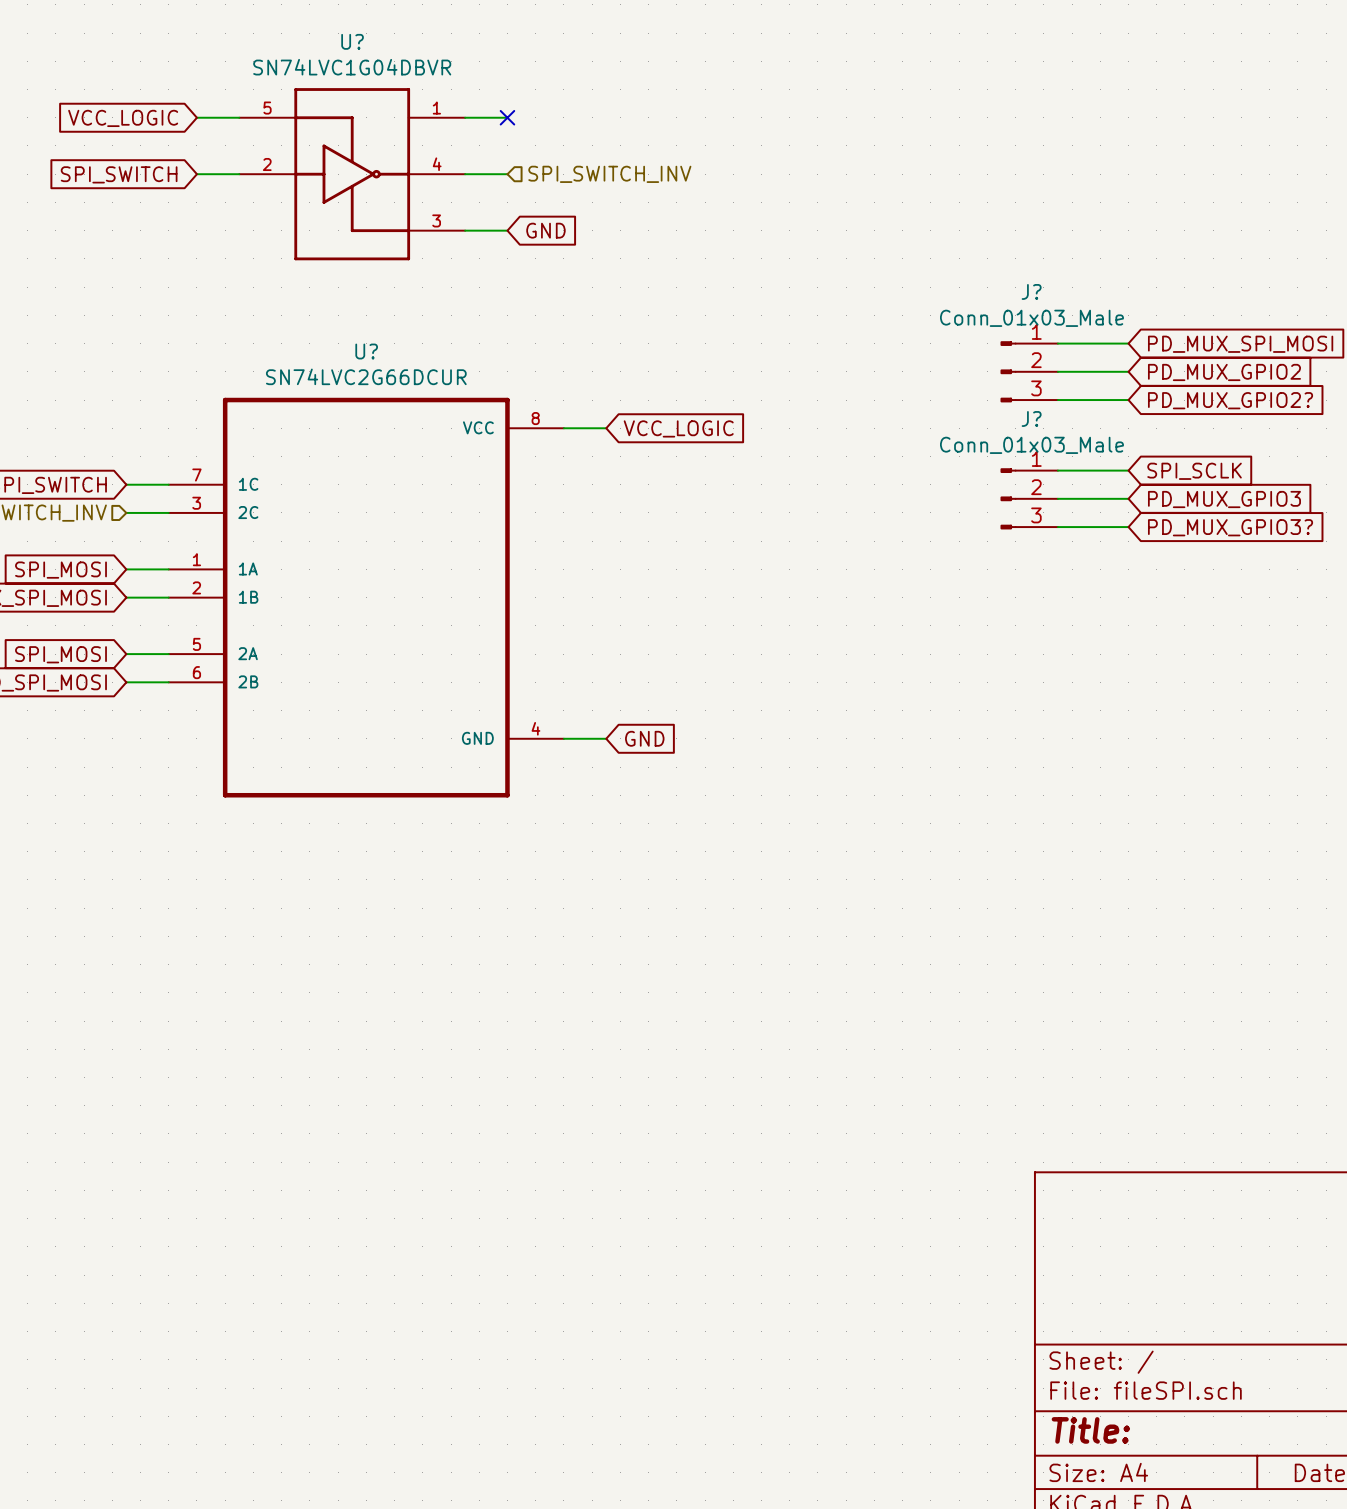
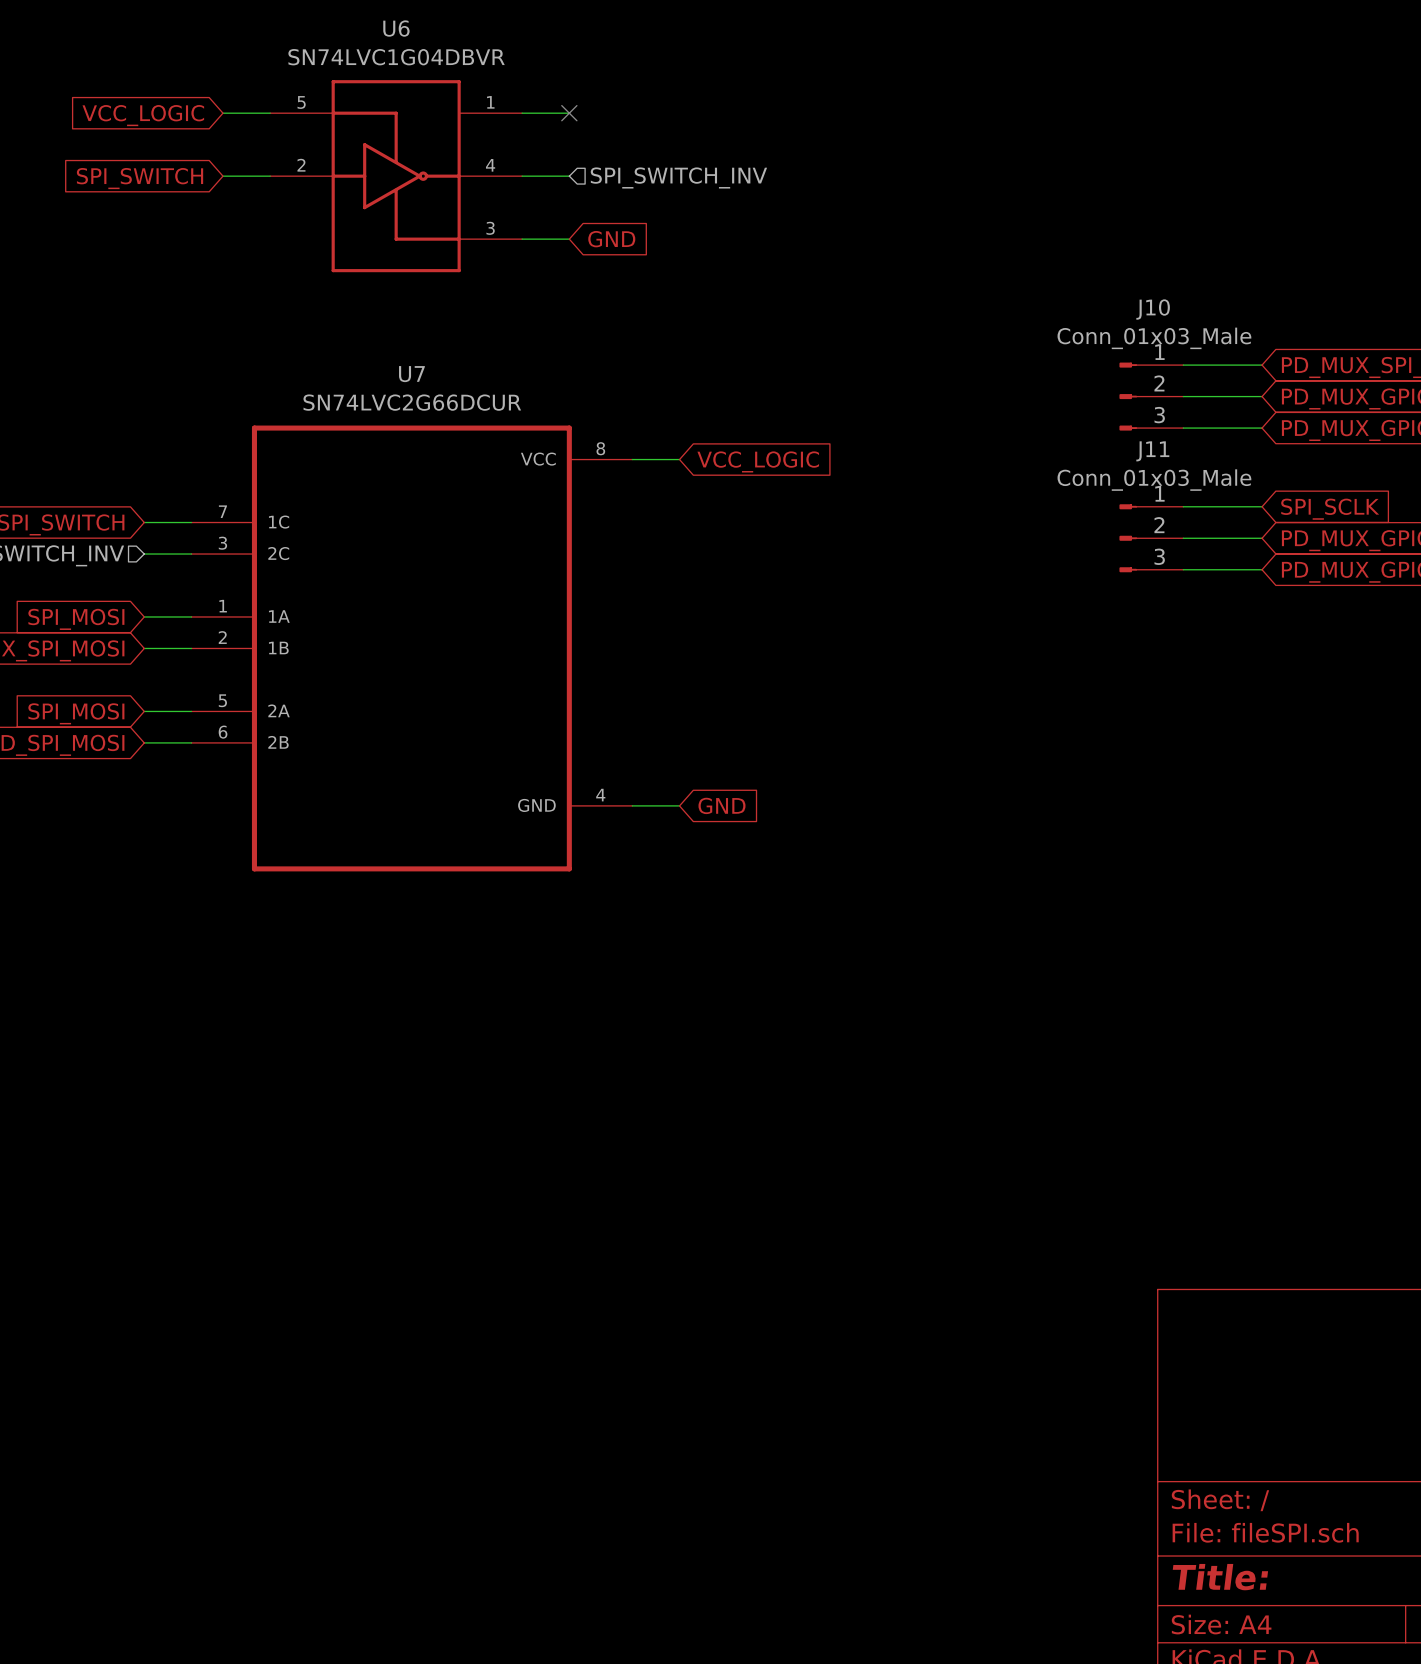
U? name: U? (352, 41) -> U6 (396, 28)
J? name: J? (1031, 291) -> J10 (1153, 309)
U? name: U? (366, 351) -> U7 (411, 374)
J? name: J? (1031, 418) -> J11 (1152, 451)

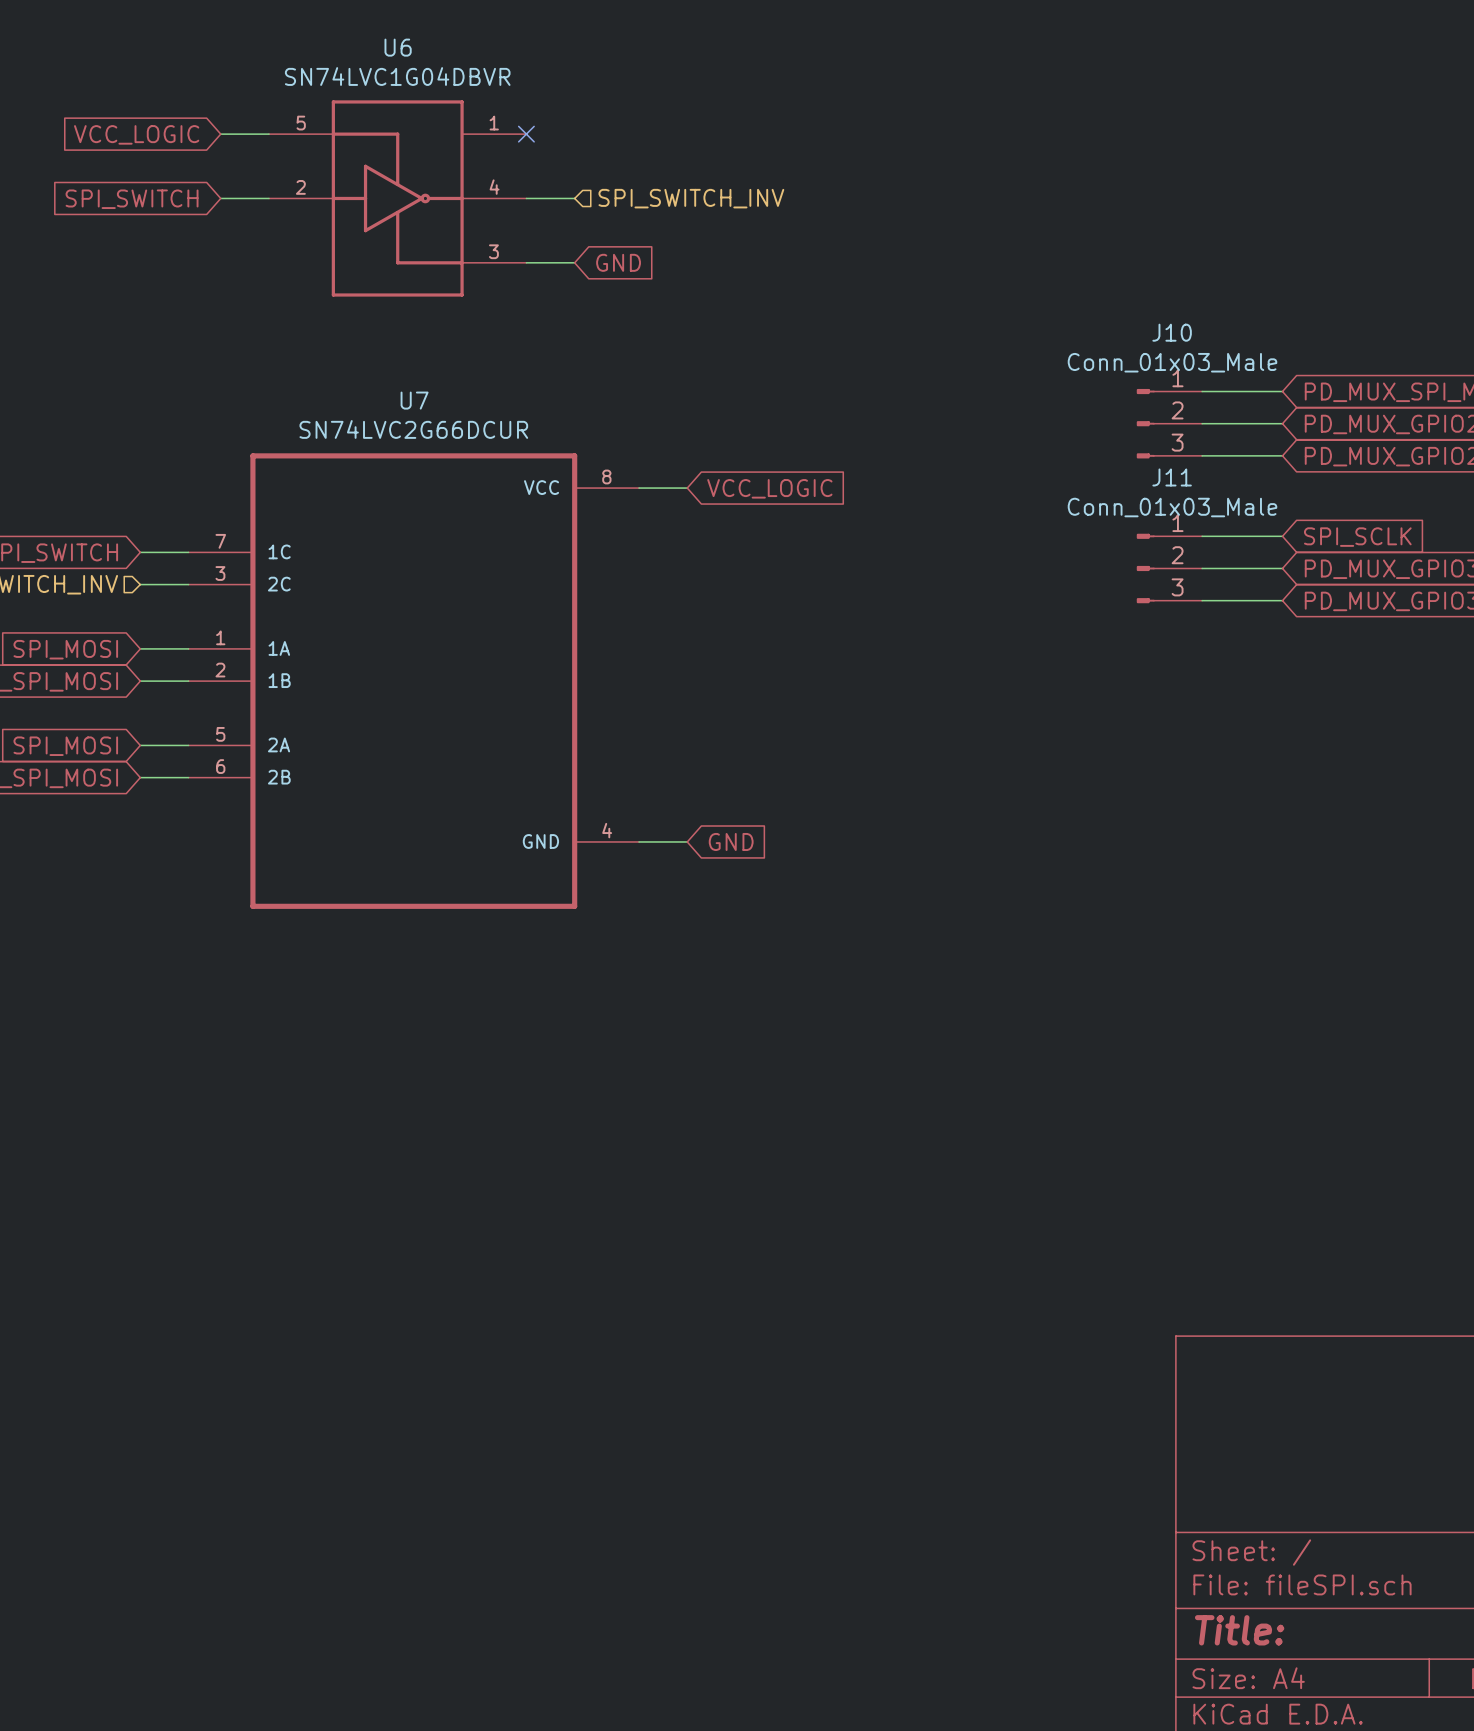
wire: (522, 113) (569, 113) -> none
no-connect mark position: (569, 113) -> (526, 134)

